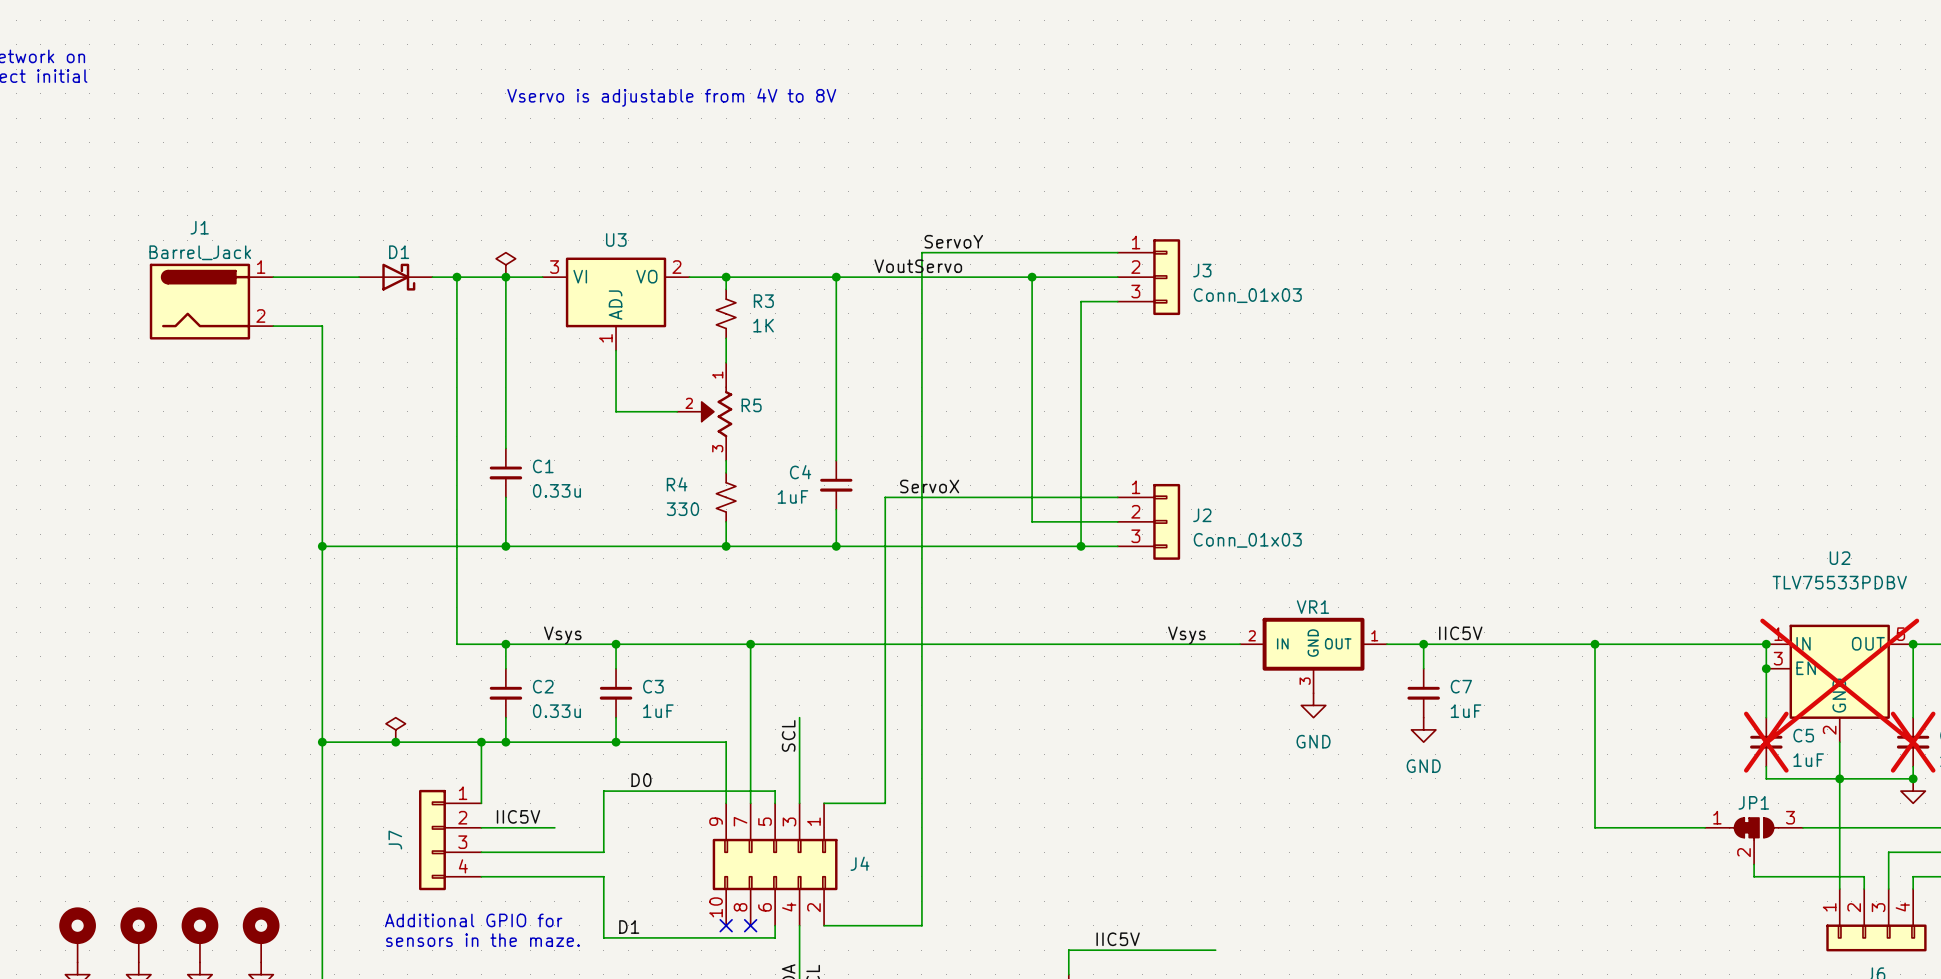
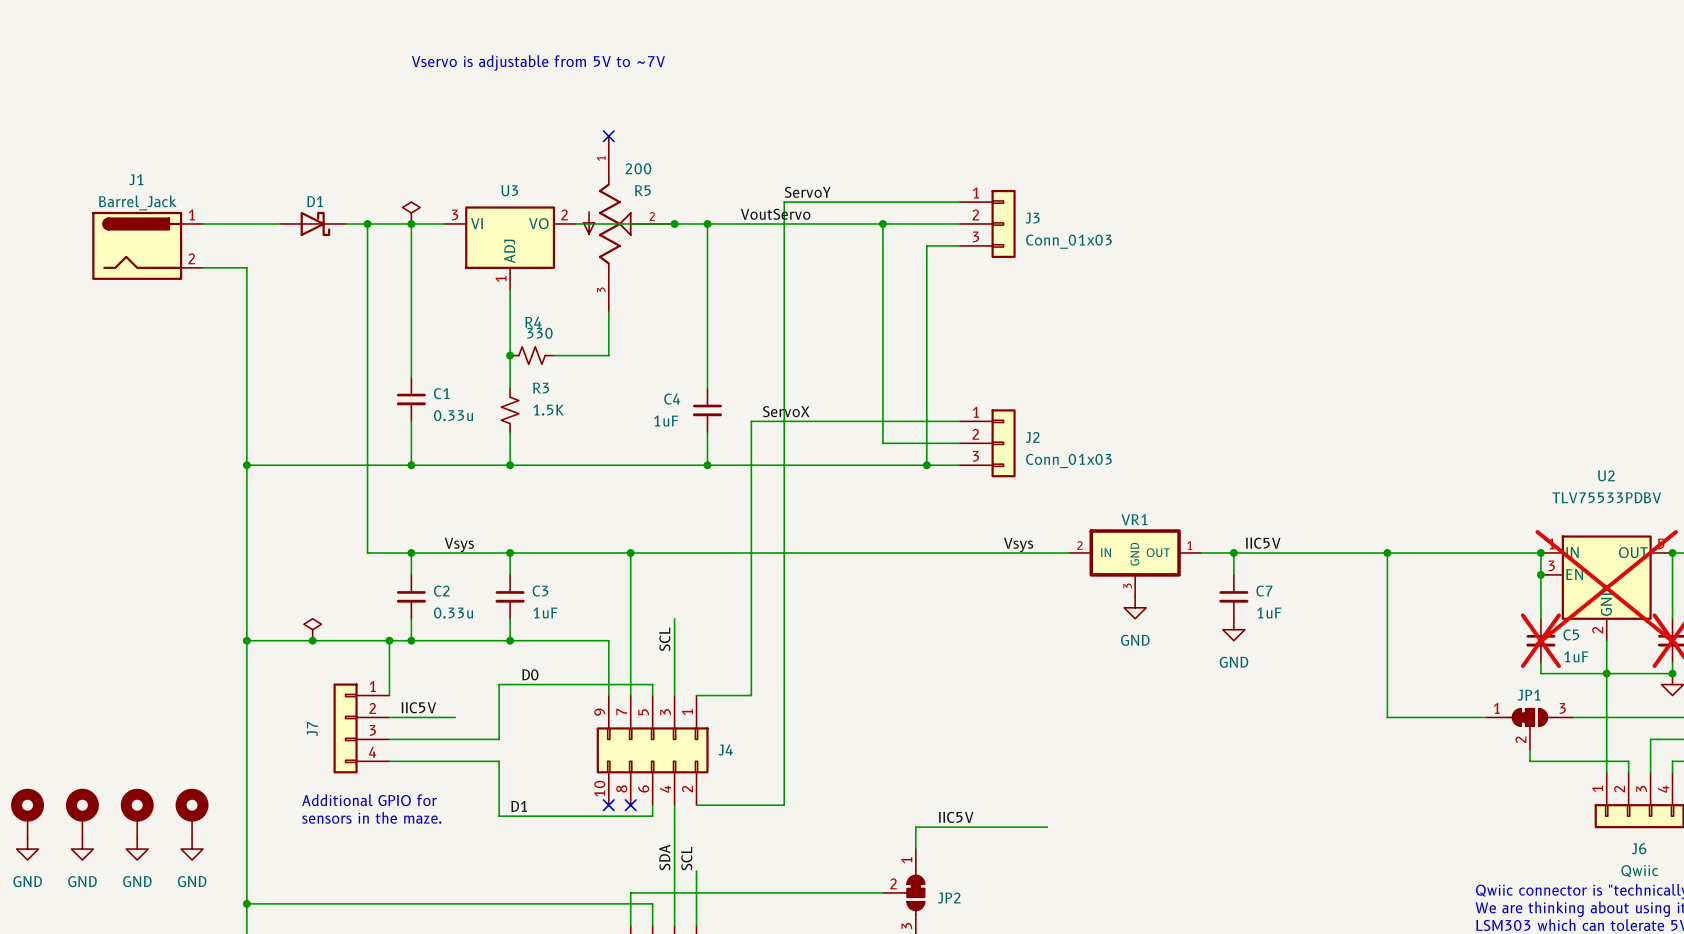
text: Vservo is adjustable from 4V to 8V (671, 97) -> Vservo is adjustable from 5V to ~7V (538, 62)
no-connect mark: none -> (608, 136)
R5 value: none -> 200 (638, 168)
wire: (726, 277) (726, 289) -> none
junction: (726, 277) -> none
junction: none -> (674, 223)
R3 name position: R3 (763, 301) -> R3 (541, 388)
R3 position: (726, 313) -> (510, 410)
R3 value: 1K (763, 325) -> 1.5K (548, 410)
R5 symbol: [677, 362, 733, 461] -> [582, 136, 675, 312]
wire: none -> (608, 311) (608, 355) (553, 355)
R5 name position: R5 (751, 405) -> R5 (642, 190)
wire: (616, 411) (677, 411) -> (510, 344) (510, 388)
junction: none -> (510, 355)
wire: (726, 460) (726, 472) -> none
R4 name position: R4 (677, 484) -> R4 (533, 322)
R4 rotation: 0° (726, 497) -> 90° clockwise (532, 355)
R4 position: (726, 497) -> (532, 355)
wire: none -> (510, 432) (510, 465)
R4 value position: 330 (682, 509) -> 330 (539, 333)
wire: (726, 521) (726, 546) -> none
junction: none -> (510, 465)
junction: (726, 546) -> none

